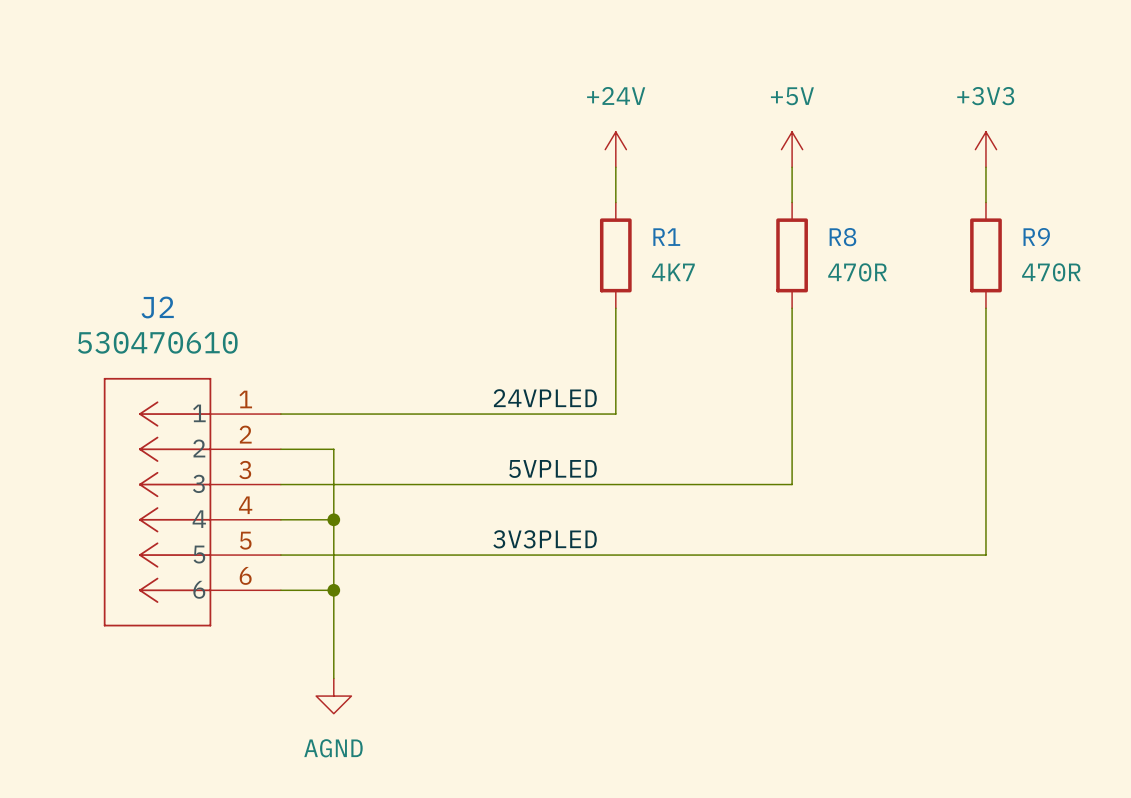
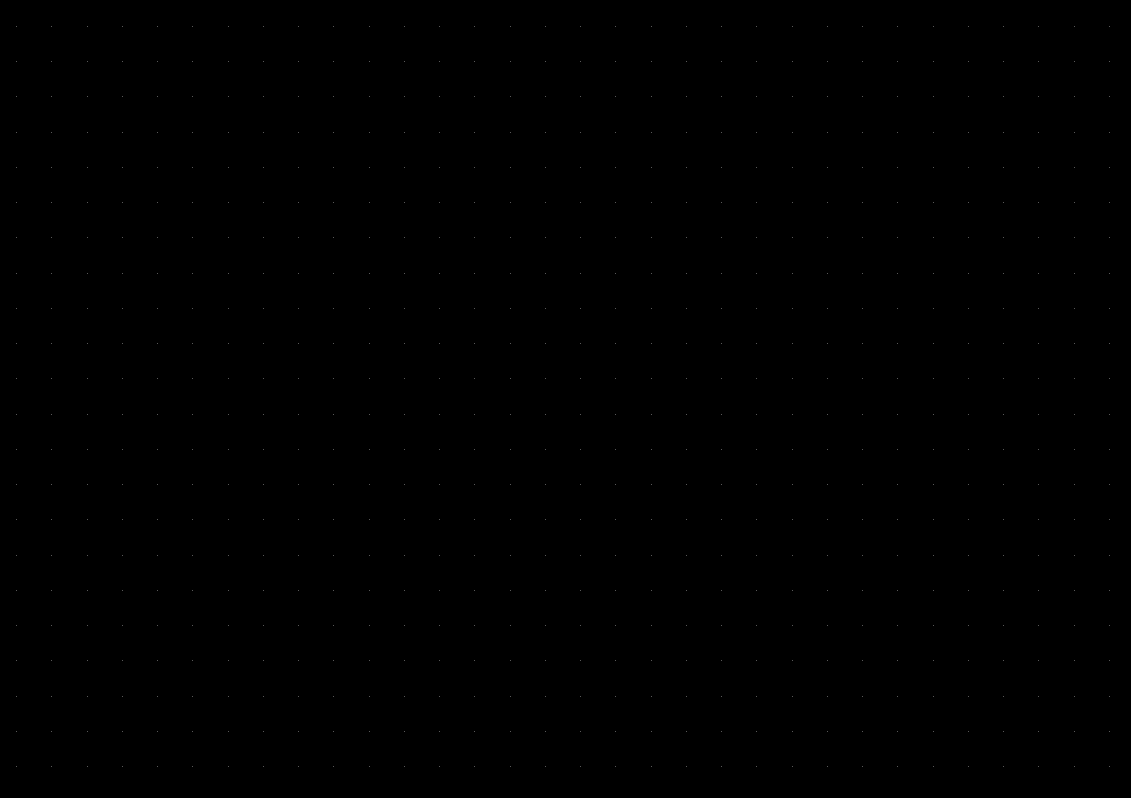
power symbol: +24V (615, 149) -> none
power symbol: +5V (792, 149) -> none
power symbol: +3V3 (985, 149) -> none
wire: (615, 167) (615, 202) -> none
wire: (792, 167) (792, 202) -> none
wire: (985, 167) (985, 202) -> none
R1: 4K7 (615, 255) -> none
R8: 470R (792, 255) -> none
R9: 470R (985, 255) -> none
wire: (615, 308) (615, 414) (280, 414) -> none
wire: (792, 308) (792, 484) (280, 484) -> none
wire: (985, 308) (985, 555) (280, 555) -> none
label: 24VPLED (545, 398) -> none
wire: (280, 449) (333, 449) (333, 678) -> none
label: 5VPLED (552, 468) -> none
J2: 530470610 (192, 502) -> none
wire: (280, 519) (333, 519) -> none
junction: (333, 519) -> none
label: 3V3PLED (545, 539) -> none
wire: (280, 590) (333, 590) -> none
junction: (333, 590) -> none
power symbol: AGND (333, 696) -> none

